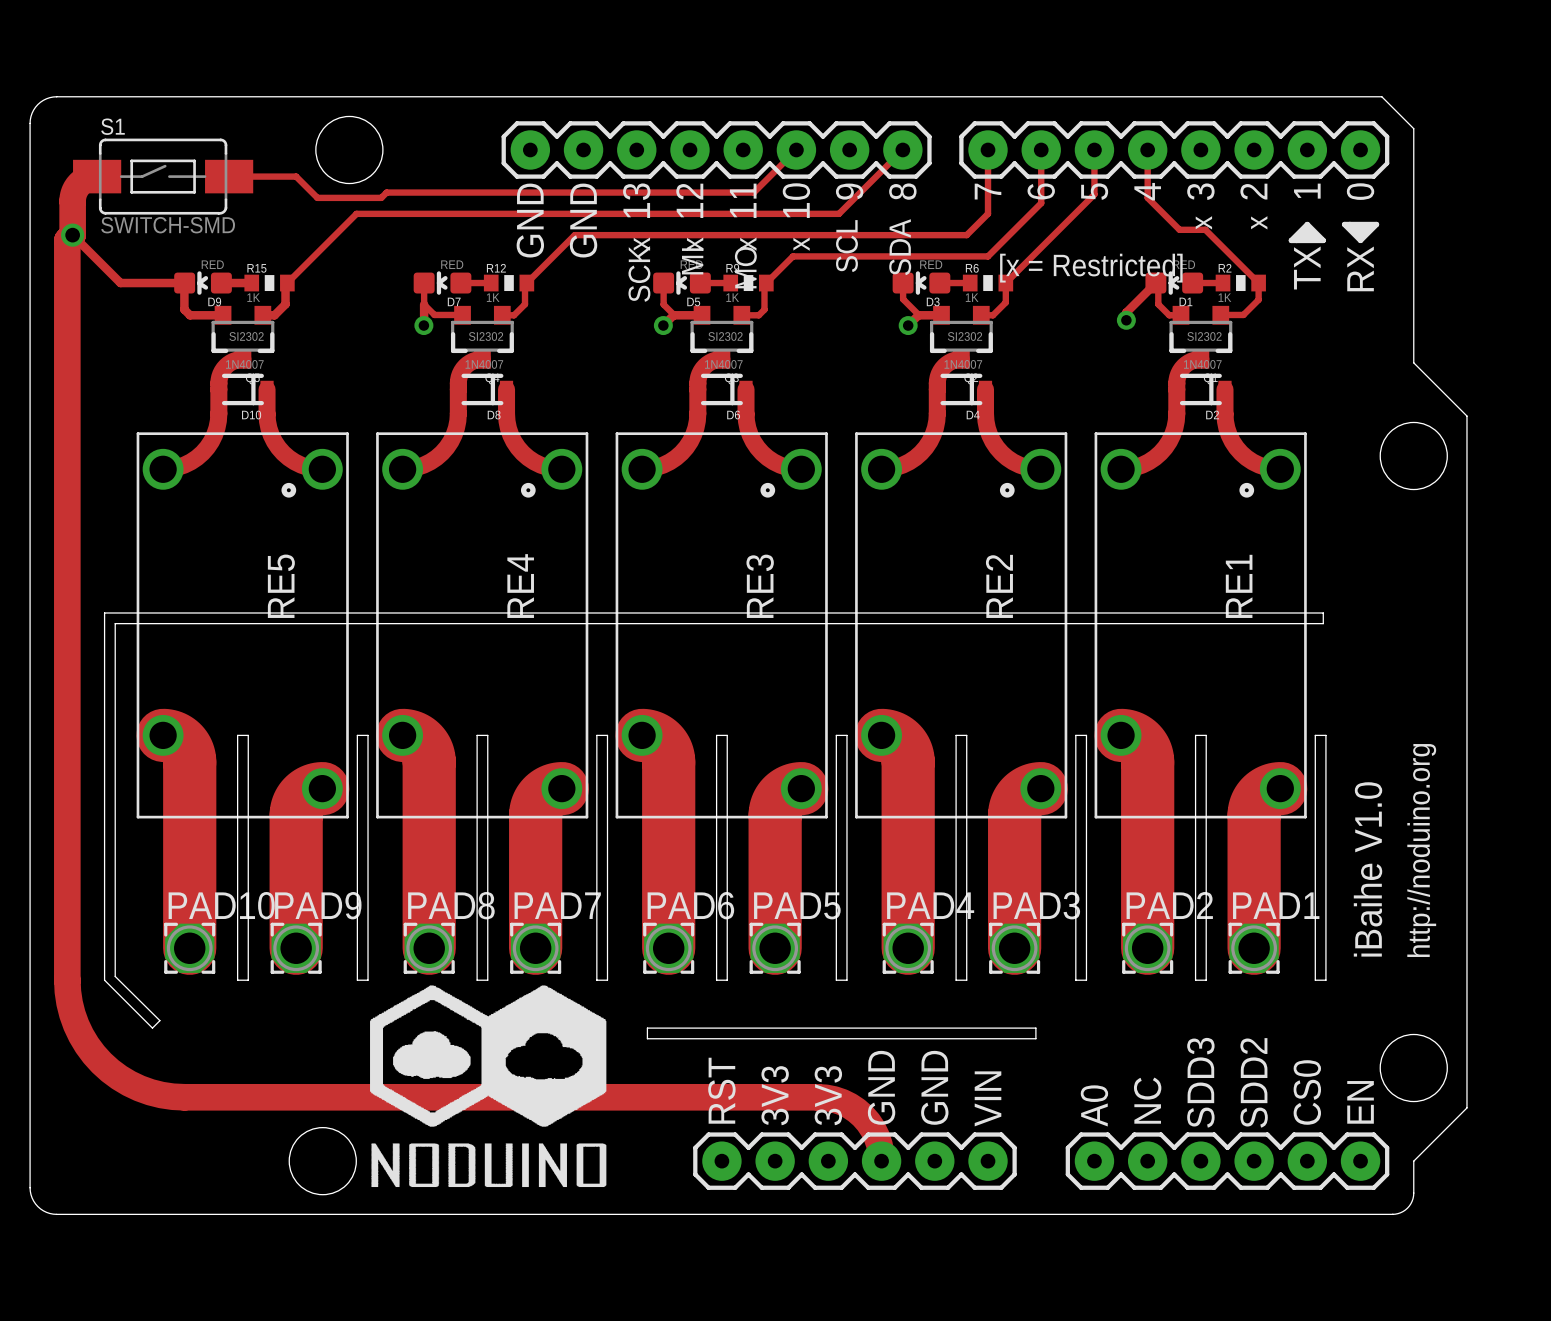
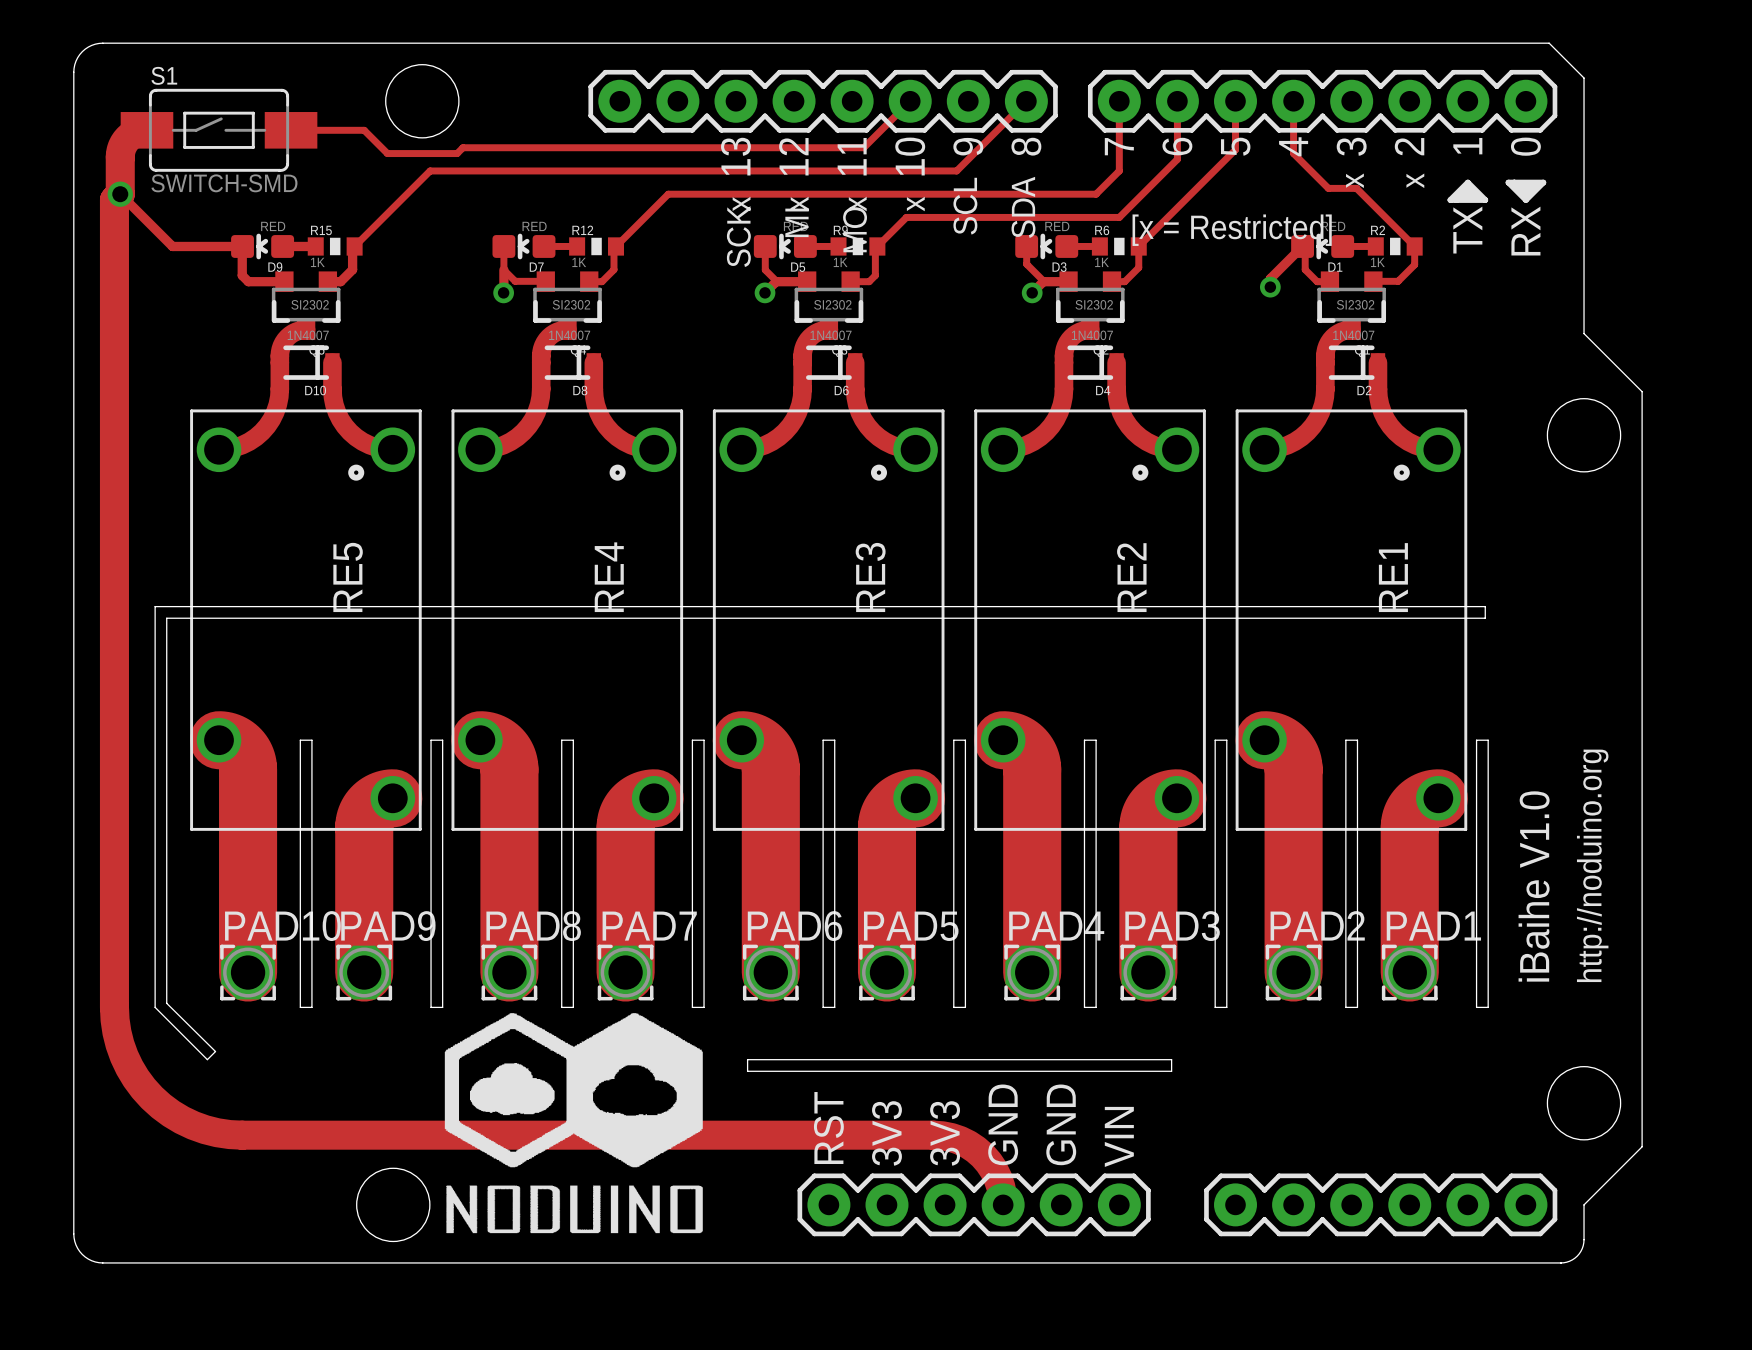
part footprint: [30, 96, 1467, 1215] -> [73, 43, 1643, 1263]

